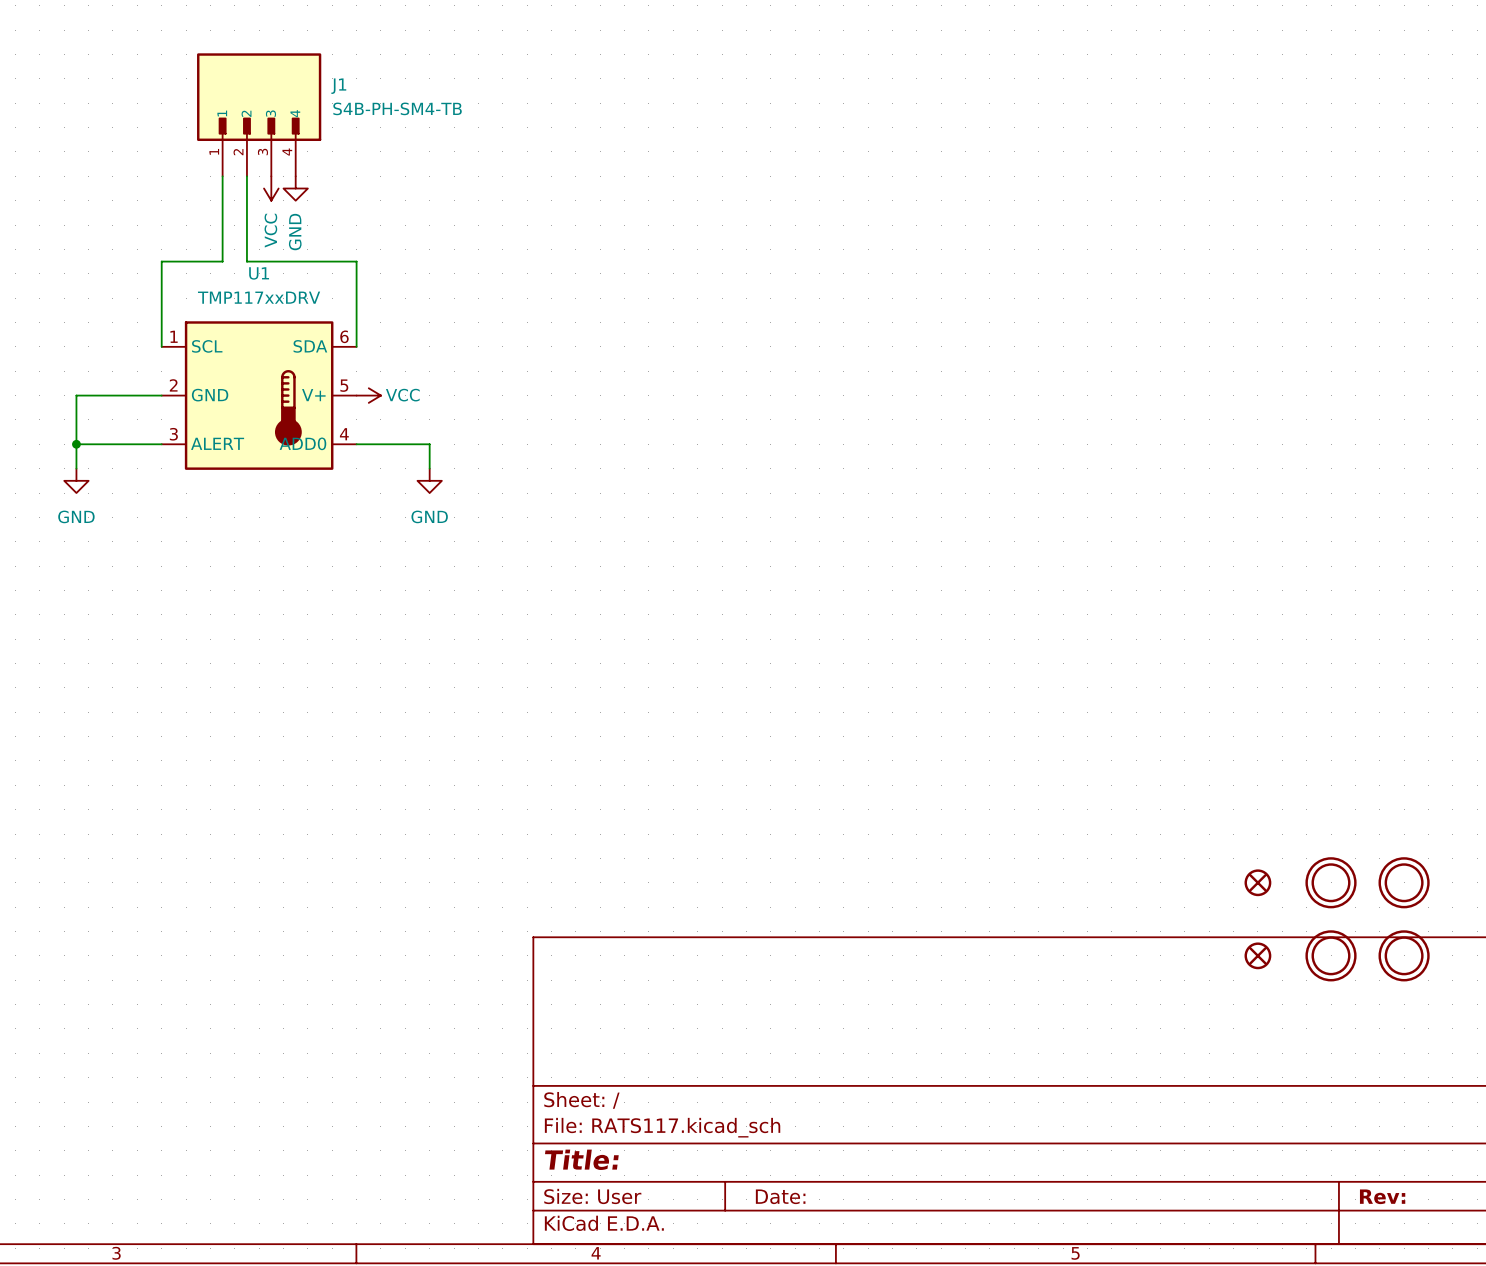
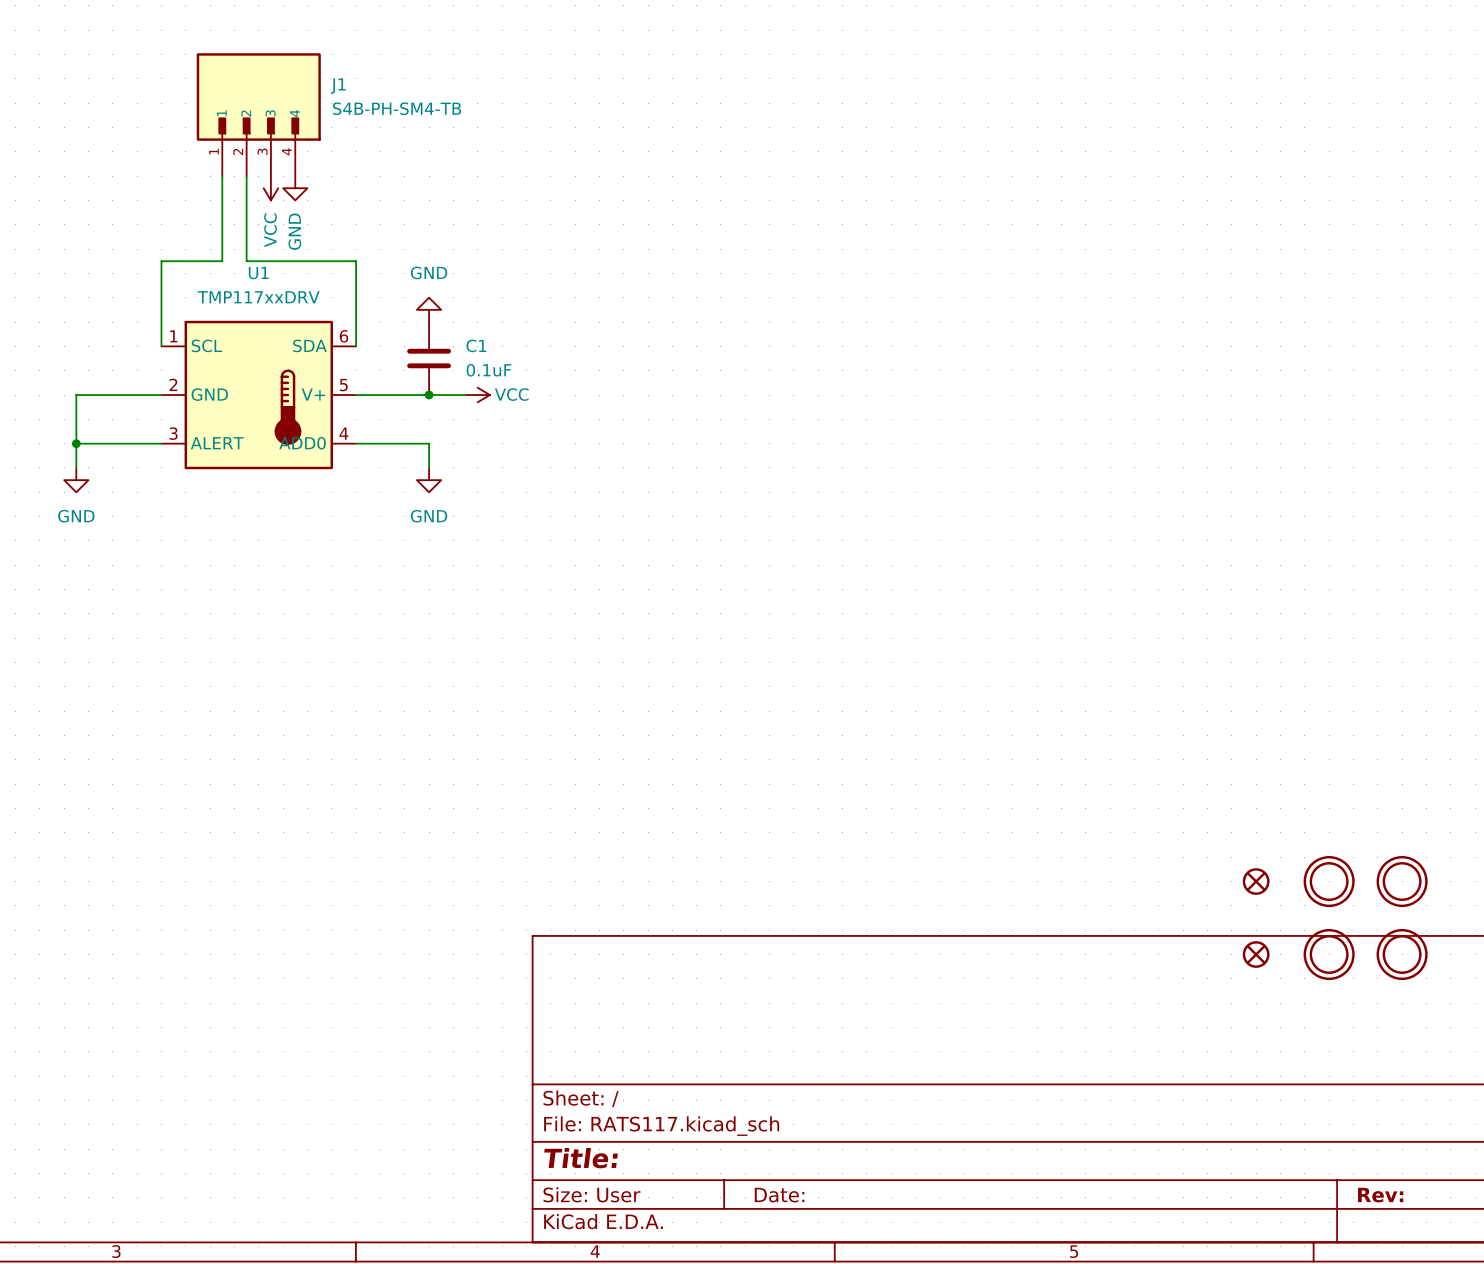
power symbol: none -> GND (429, 309)
C1: none -> 0.1uF (429, 358)
wire: none -> (356, 395) (465, 395)
power symbol position: VCC (368, 395) -> VCC (477, 395)
junction: none -> (429, 395)

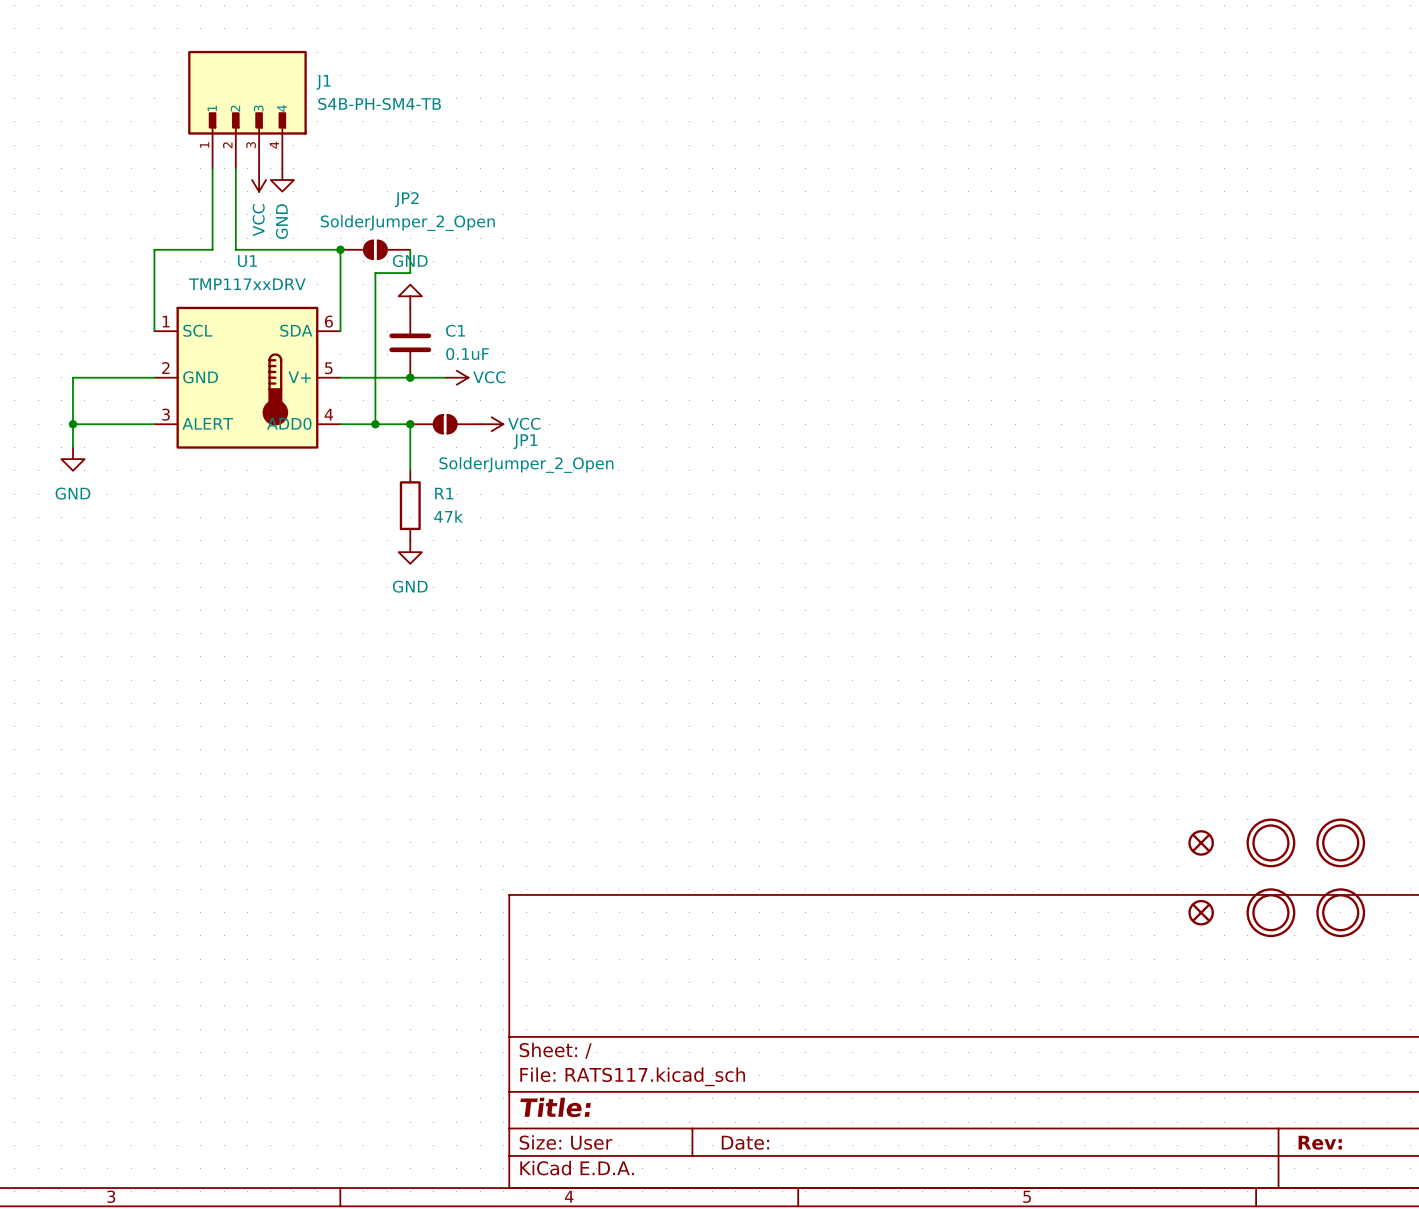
junction: none -> (340, 249)
JP2: none -> SolderJumper_2_Open (375, 249)
wire: none -> (410, 249) (410, 273) (375, 273) (375, 424)
junction: none -> (375, 424)
junction: none -> (410, 424)
JP1: none -> SolderJumper_2_Open (445, 424)
power symbol: none -> VCC (491, 424)
power symbol position: GND (429, 480) -> GND (410, 552)
R1: none -> 47k (410, 505)

